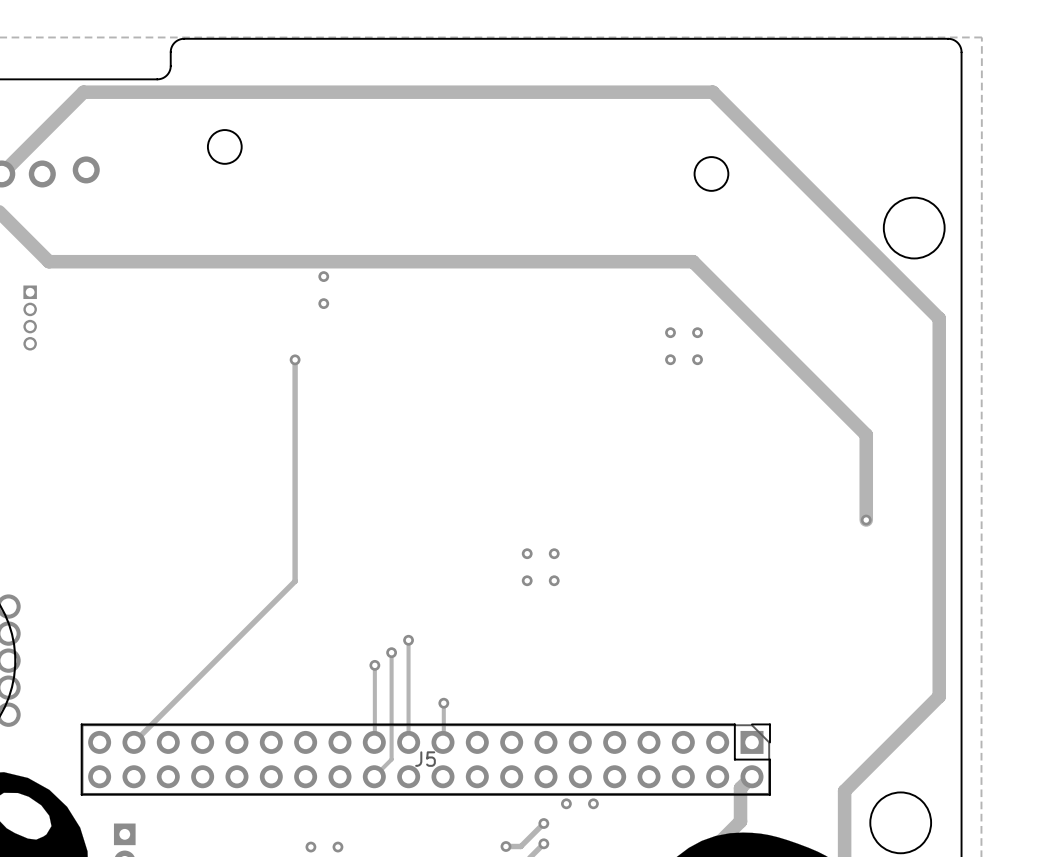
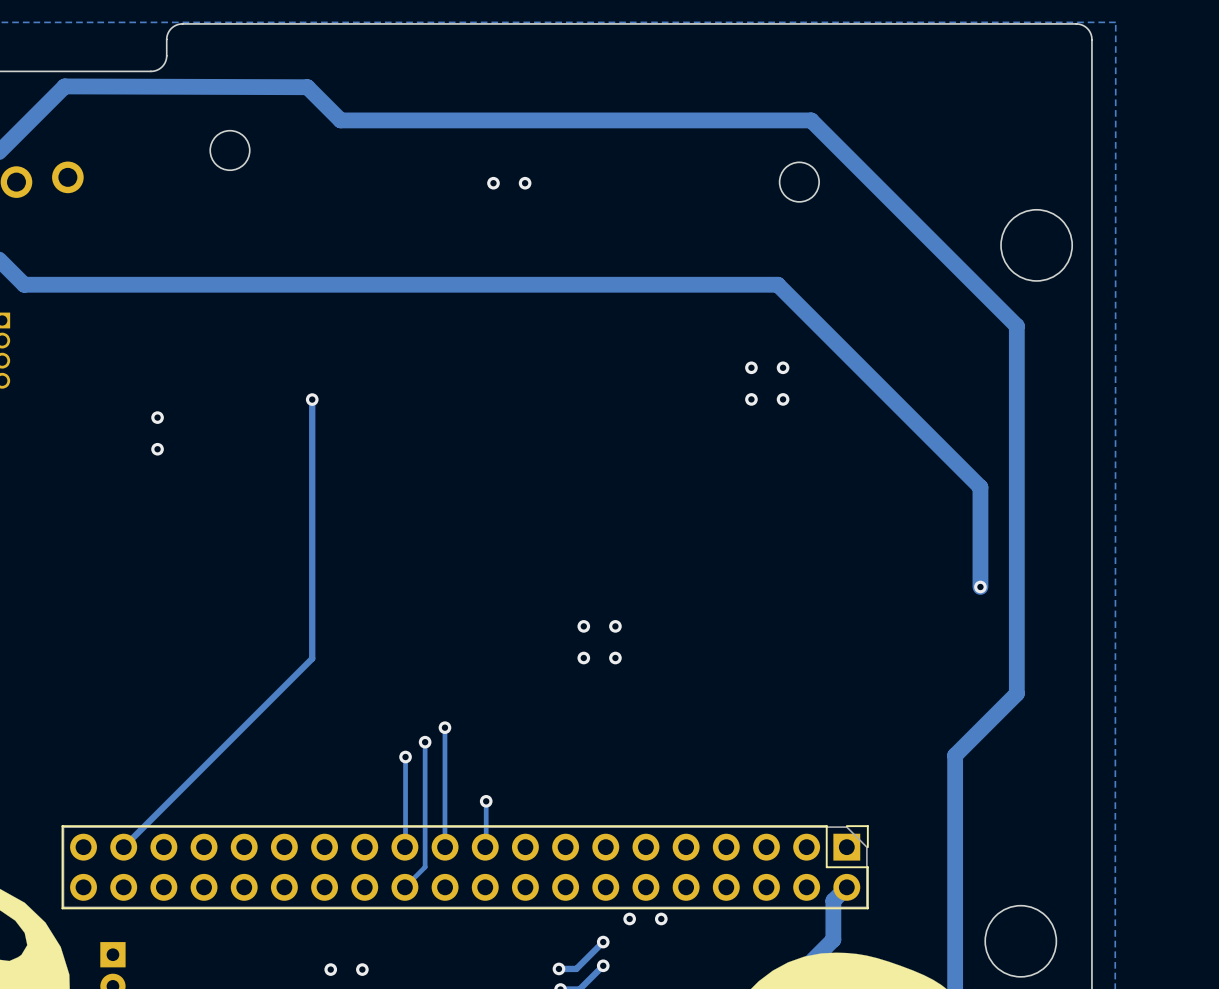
track: (83, 92) (712, 92) (939, 318) (939, 696) (844, 791) -> (64, 86) (307, 87) (340, 120) (811, 120) (1016, 326) (1016, 693) (955, 755) (955, 904)
via: none -> (493, 183)
via: none -> (525, 183)
via: (323, 276) -> none
via: (323, 303) -> none
via: none -> (157, 417)
via: none -> (157, 449)
J5 name: J5 (425, 759) -> none

